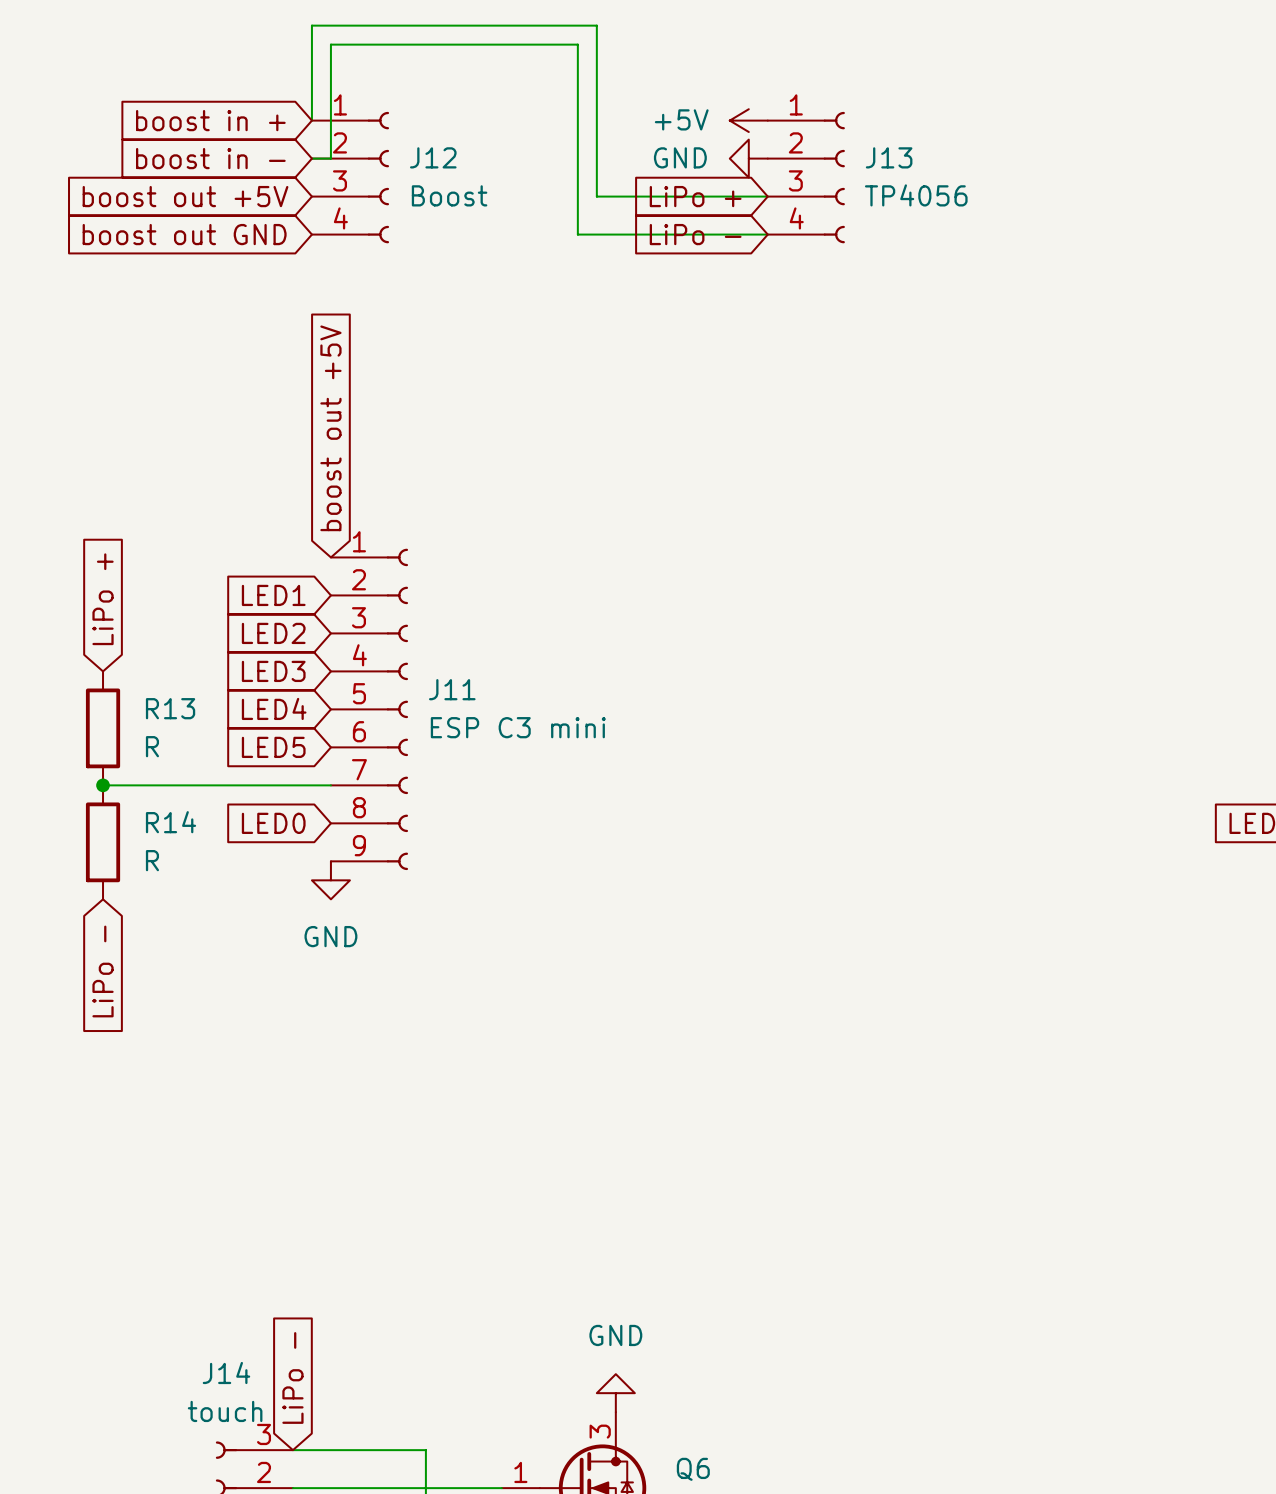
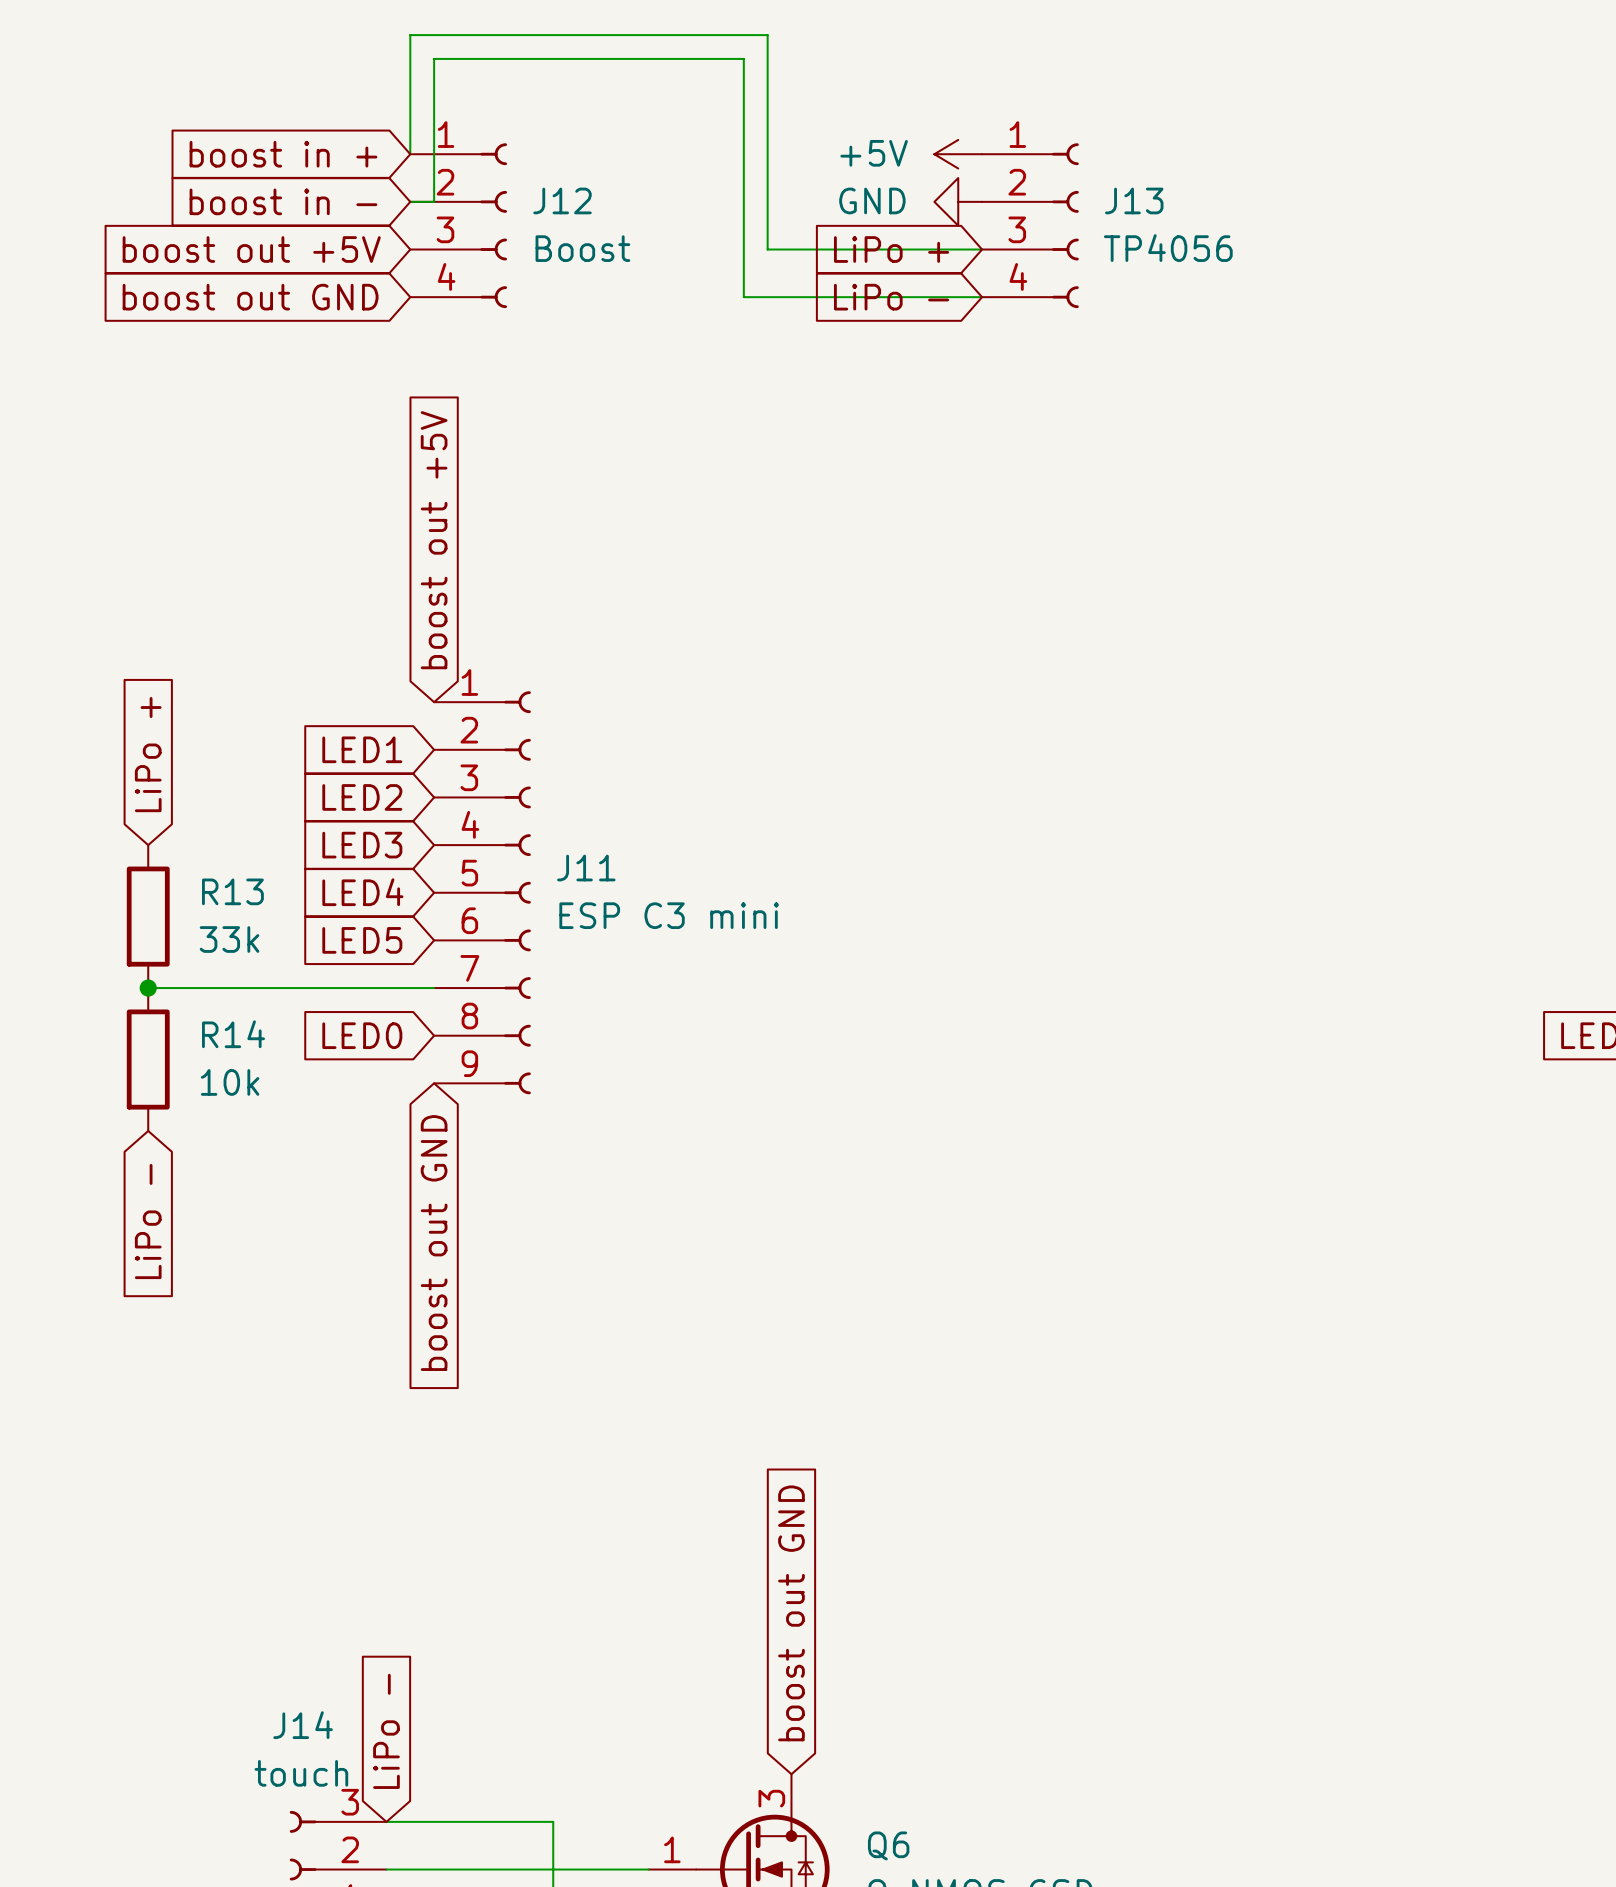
R13 value: R (152, 746) -> 33k (229, 939)
R14 value: R (152, 860) -> 10k (230, 1082)
power symbol: GND (330, 880) -> none
global label: none -> boost out GND (434, 1243)
global label: none -> boost out GND (791, 1613)
power symbol: GND (615, 1393) -> none

